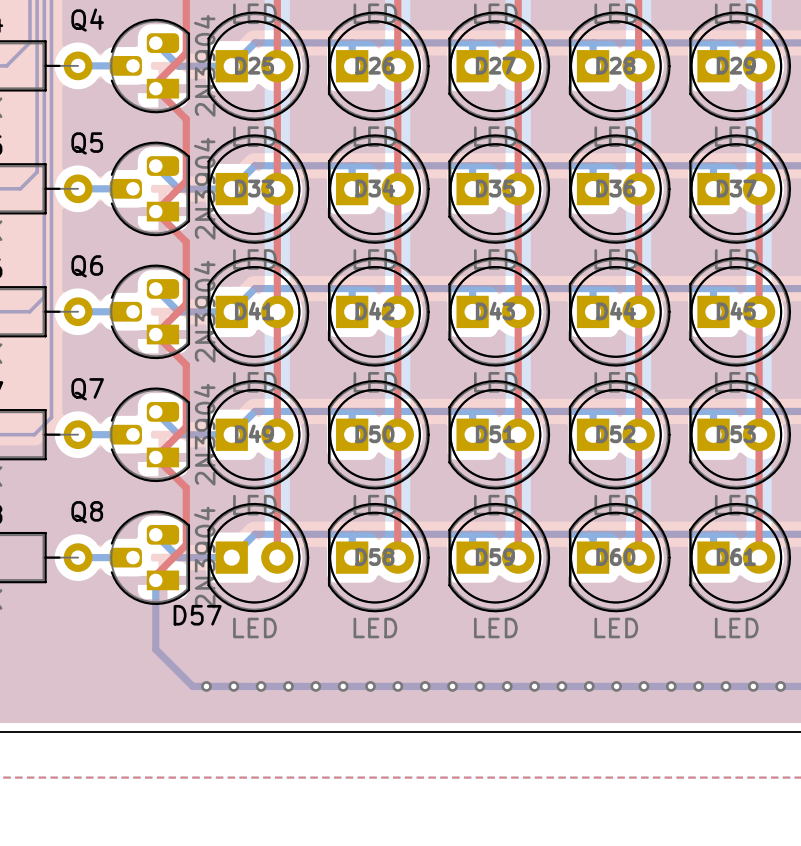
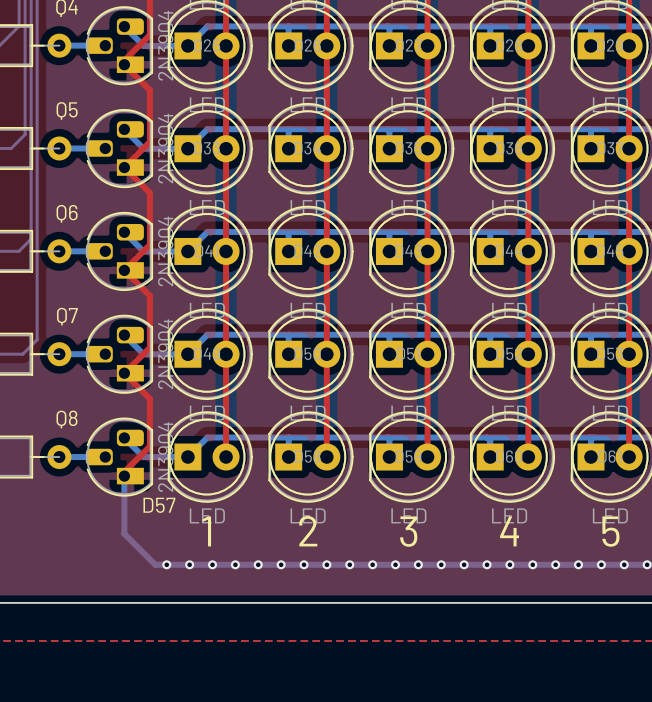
text: none -> 4 (509, 531)
text: none -> 1 (206, 531)
text: none -> 2 (308, 531)
text: none -> 3 (408, 531)
text: none -> 5 (610, 531)

